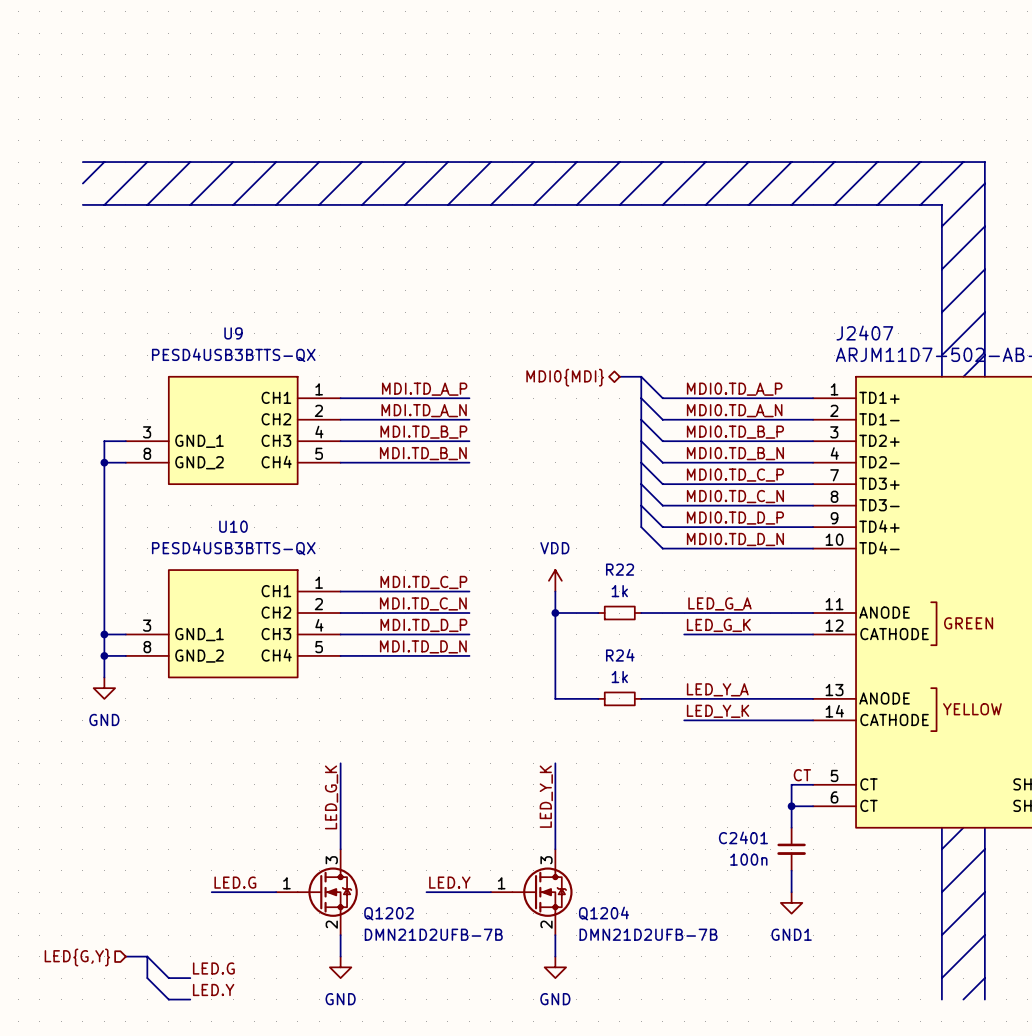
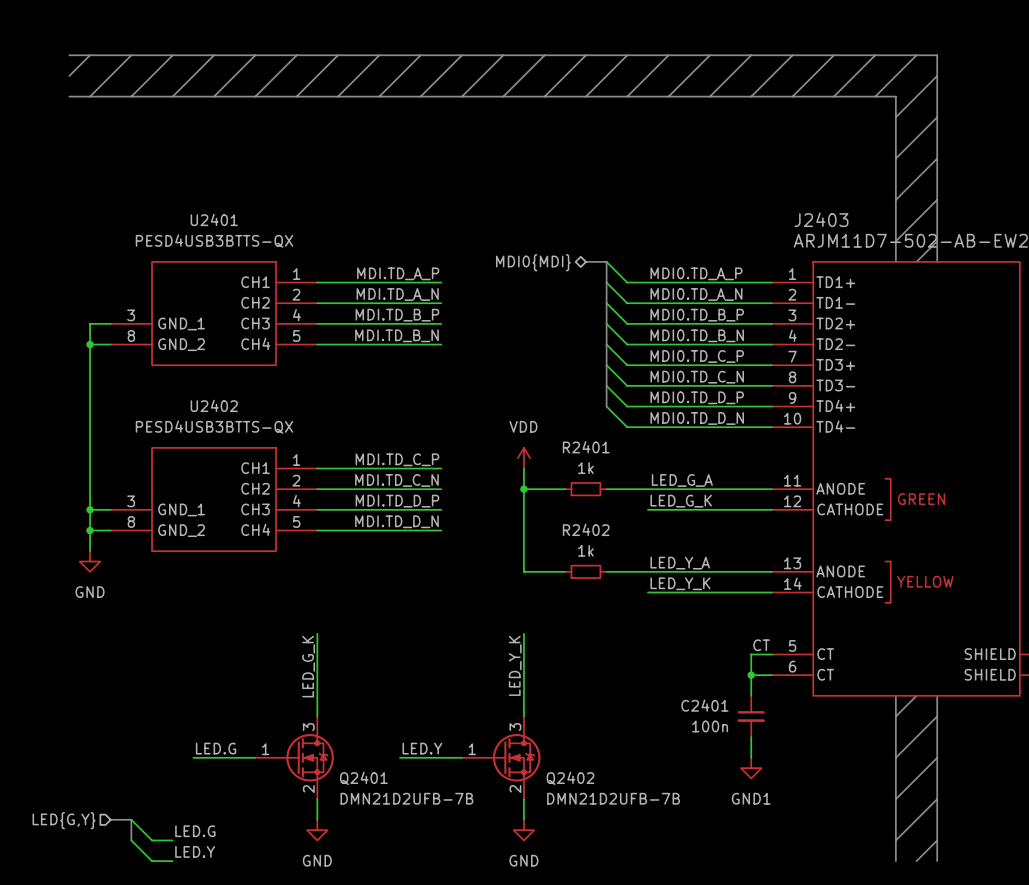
U9 name: U9 (233, 333) -> U2401 (214, 219)
J2407 name: J2407 (864, 333) -> J2403 (821, 219)
U10 name: U10 (233, 526) -> U2402 (214, 405)
R22 name: R22 (620, 569) -> R2401 (586, 447)
R24 name: R24 (620, 655) -> R2402 (586, 529)
Q1202 name: Q1202 (389, 913) -> Q2401 (363, 778)
Q1204 name: Q1204 (604, 913) -> Q2402 (570, 778)

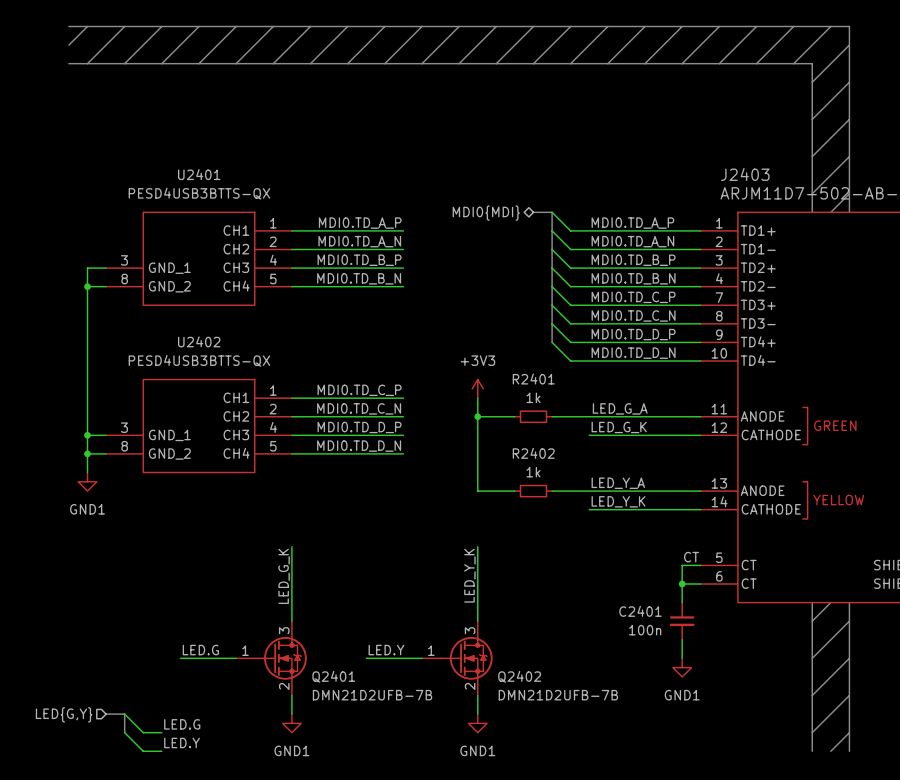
label: MDI.TD_A_P (398, 273) -> MDI0.TD_A_P (360, 223)
label: MDI.TD_A_N (397, 294) -> MDI0.TD_A_N (359, 241)
label: MDI.TD_B_P (397, 315) -> MDI0.TD_B_P (359, 260)
label: MDI.TD_B_N (396, 335) -> MDI0.TD_B_N (359, 278)
power symbol: VDD (523, 458) -> +3V3 (477, 388)
label: MDI.TD_C_P (397, 459) -> MDI0.TD_C_P (359, 390)
label: MDI.TD_C_N (396, 480) -> MDI0.TD_C_N (359, 408)
label: MDI.TD_D_P (397, 501) -> MDI0.TD_D_P (359, 427)
label: MDI.TD_D_N (396, 521) -> MDI0.TD_D_N (359, 446)
power symbol: GND (90, 561) -> GND1 (87, 481)
power symbol: GND (317, 830) -> GND1 (291, 723)
power symbol: GND (523, 830) -> GND1 (477, 723)

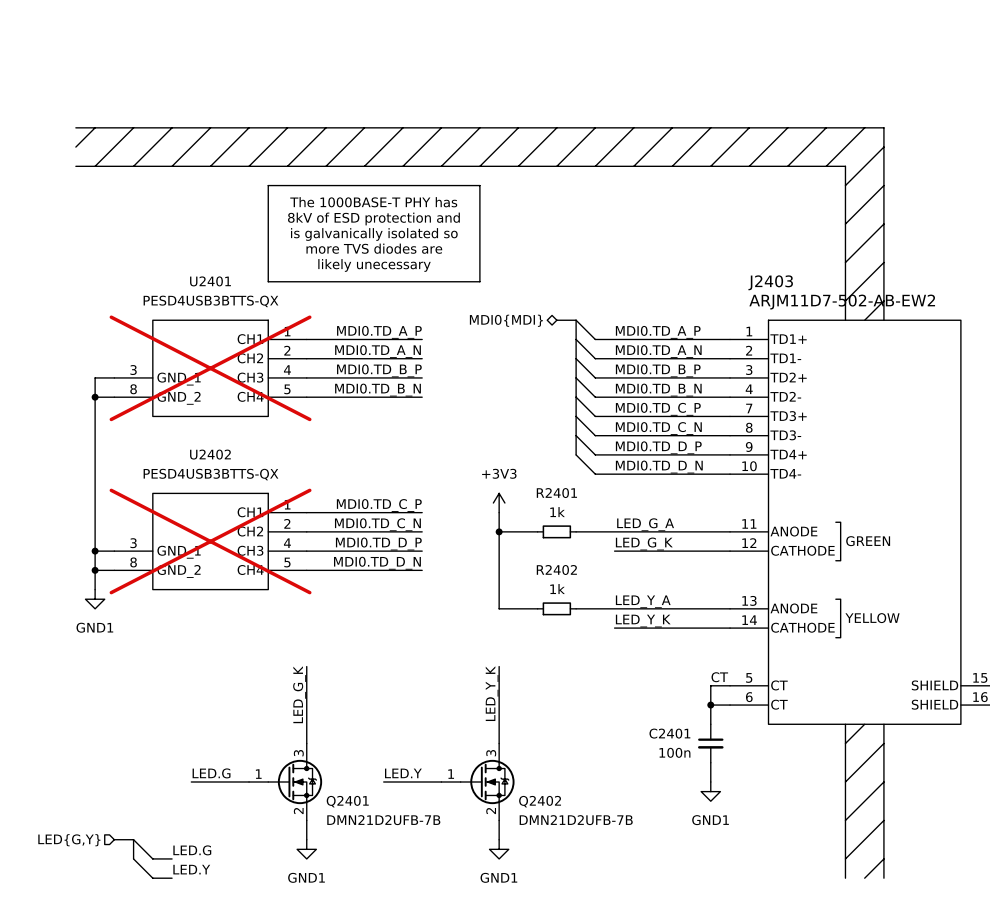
line: none -> (268, 185) (479, 185) (479, 281) (268, 281) (268, 185)
text: none -> The 1000BASE-T PHY has (373, 202)
text: none -> 8kV of ESD protection and (373, 218)
text: none -> is galvanically isolated so (374, 234)
text: none -> more TVS diodes are (374, 248)
text: none -> likely unecessary (374, 265)
U2401 do-not-place cross: none -> (210, 368)
U2402 do-not-place cross: none -> (210, 541)

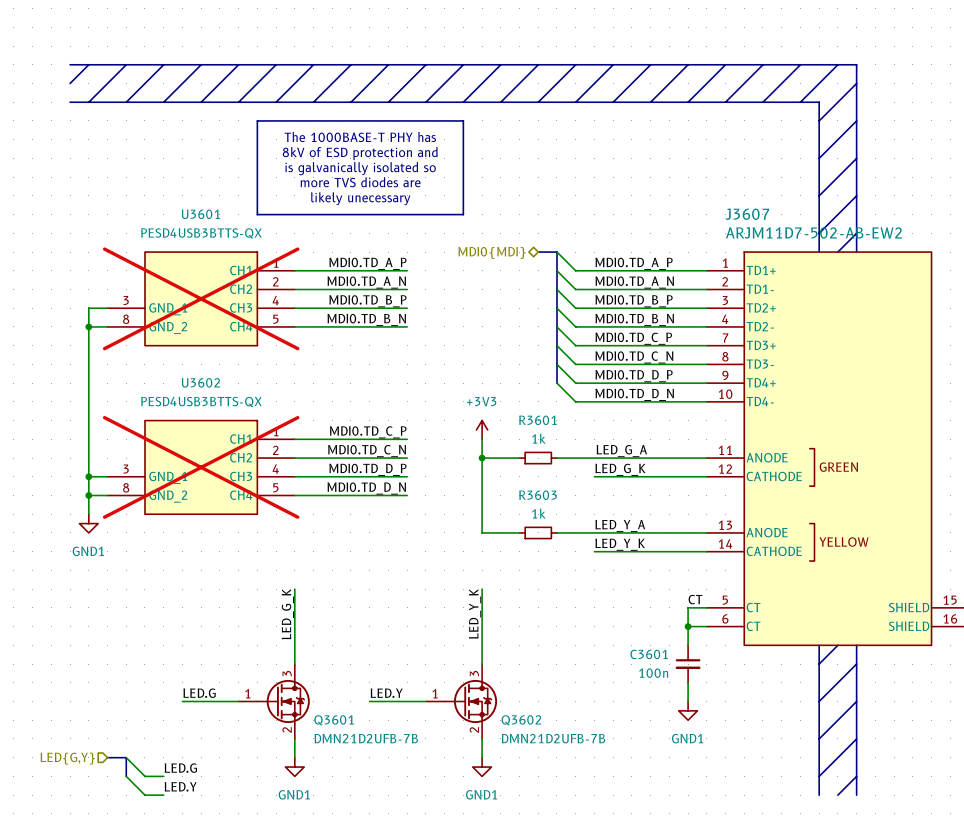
U2401 name: U2401 (210, 281) -> U3601 (200, 214)
J2403 name: J2403 (770, 282) -> J3607 (747, 214)
U2402 name: U2402 (210, 454) -> U3602 (200, 382)
R2401 name: R2401 (556, 493) -> R3601 (537, 420)
R2402 name: R2402 (556, 570) -> R3603 (538, 495)
C2401 name: C2401 (669, 733) -> C3601 (649, 654)
Q2401 name: Q2401 (347, 801) -> Q3601 (334, 720)
Q2402 name: Q2402 (540, 801) -> Q3602 (521, 720)

